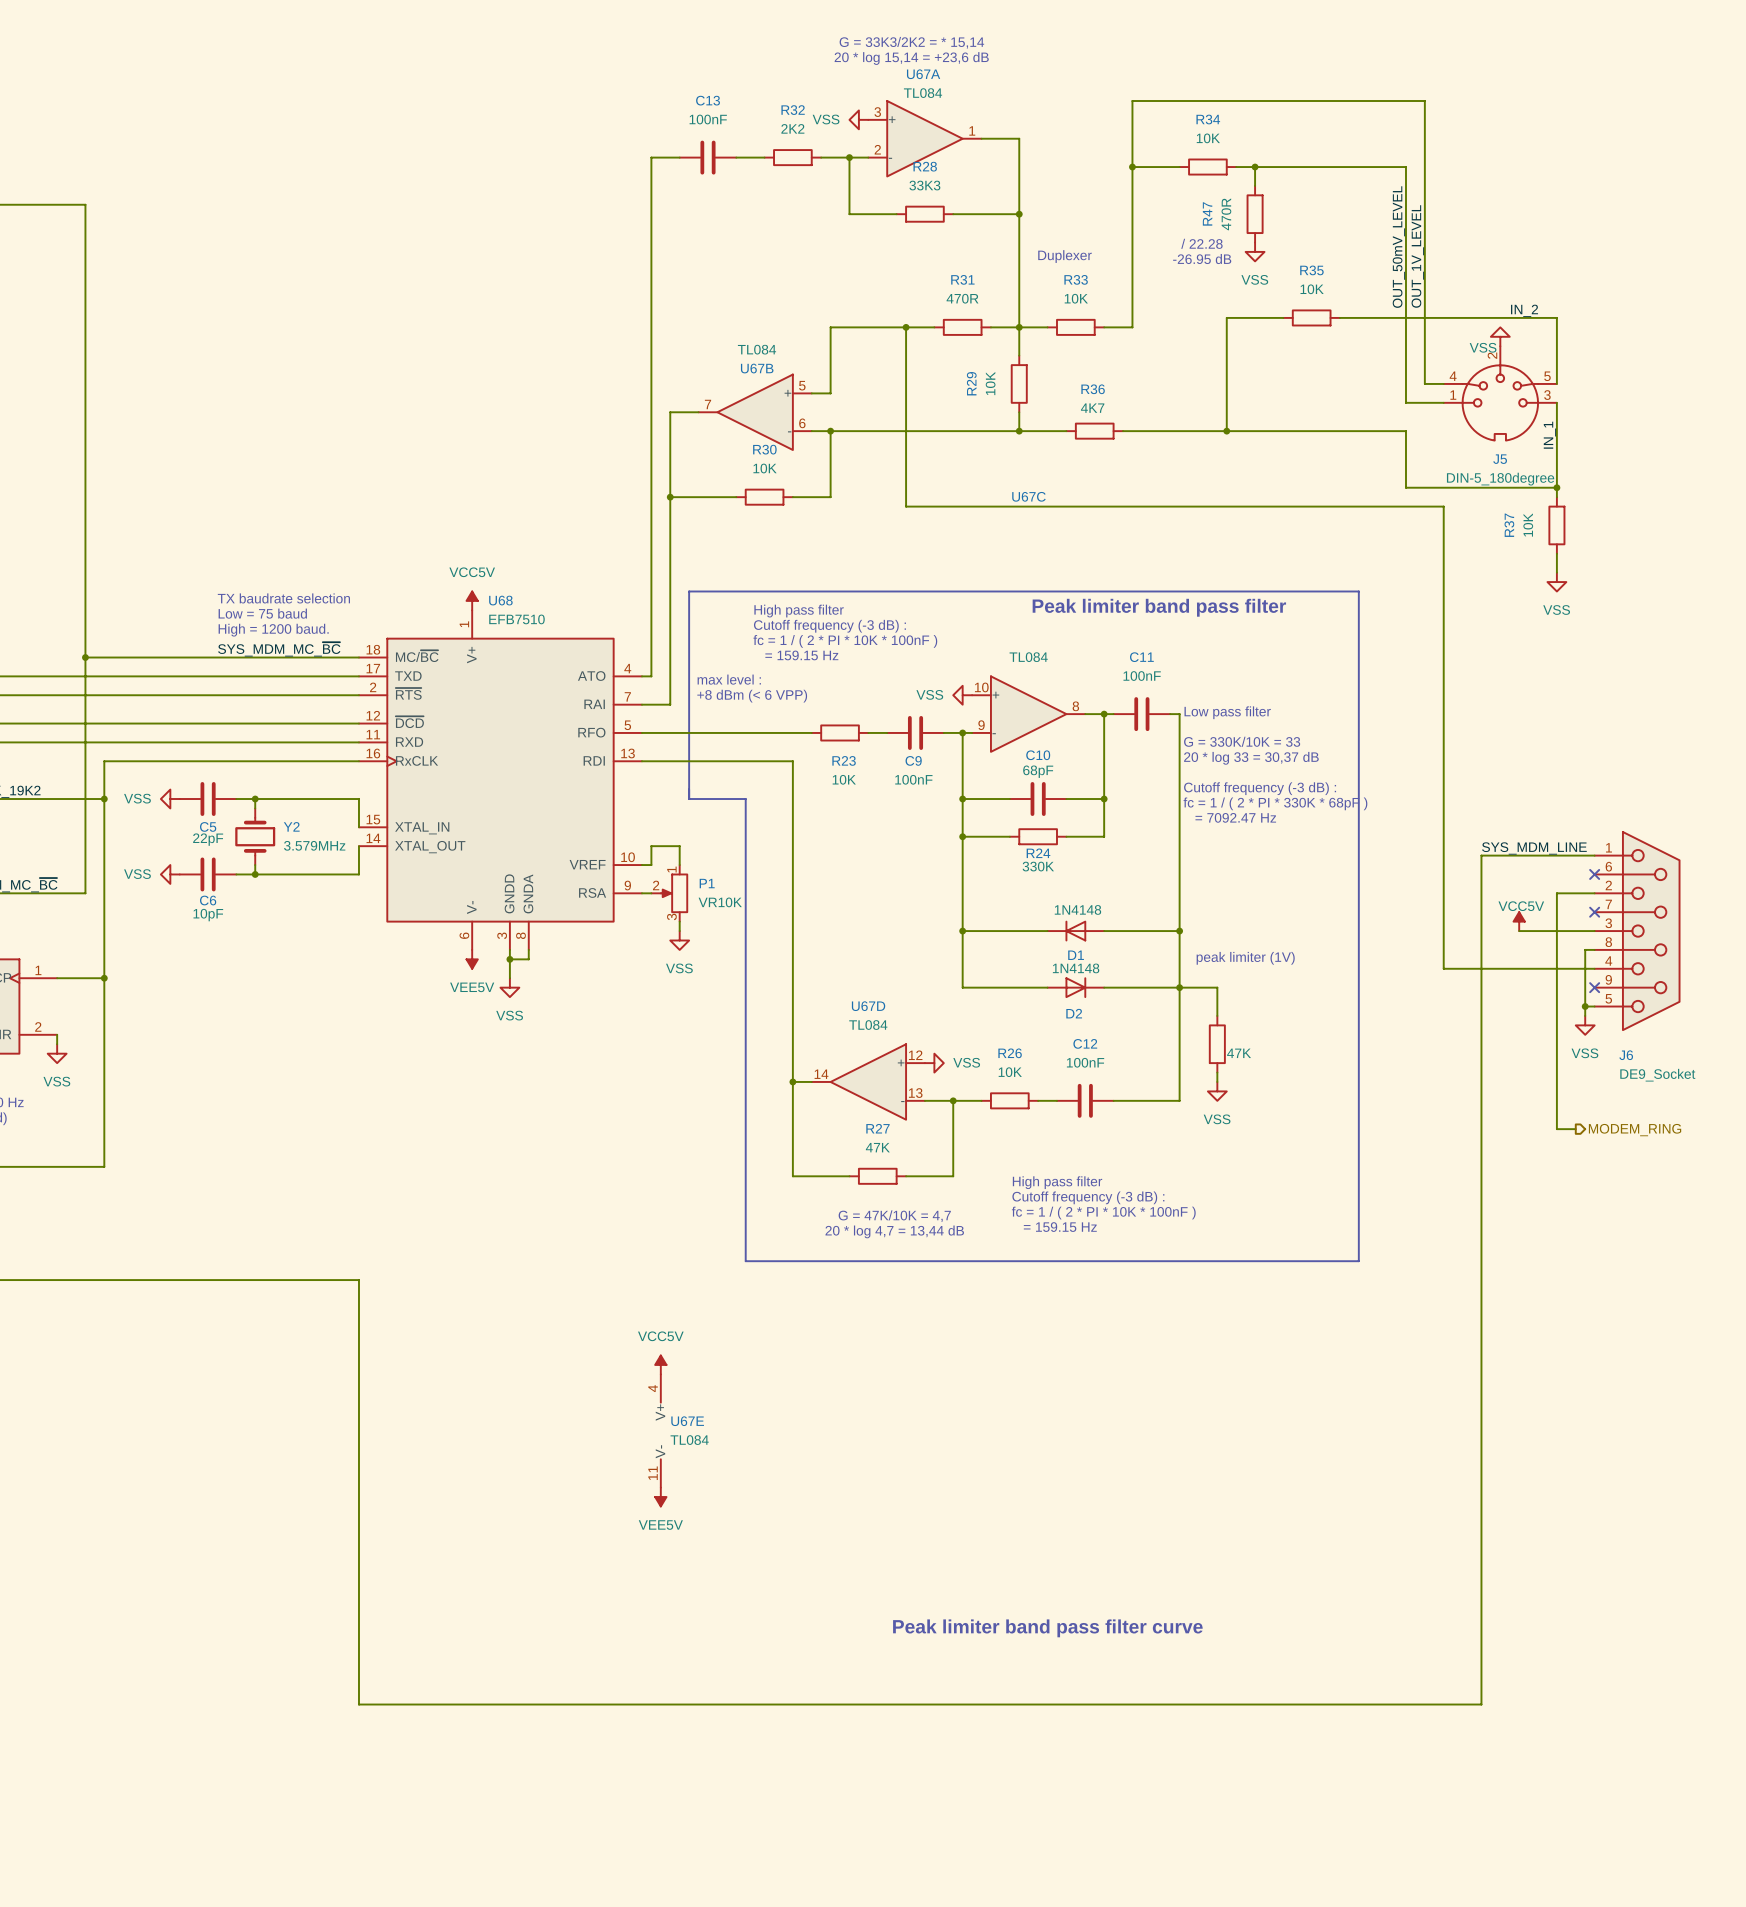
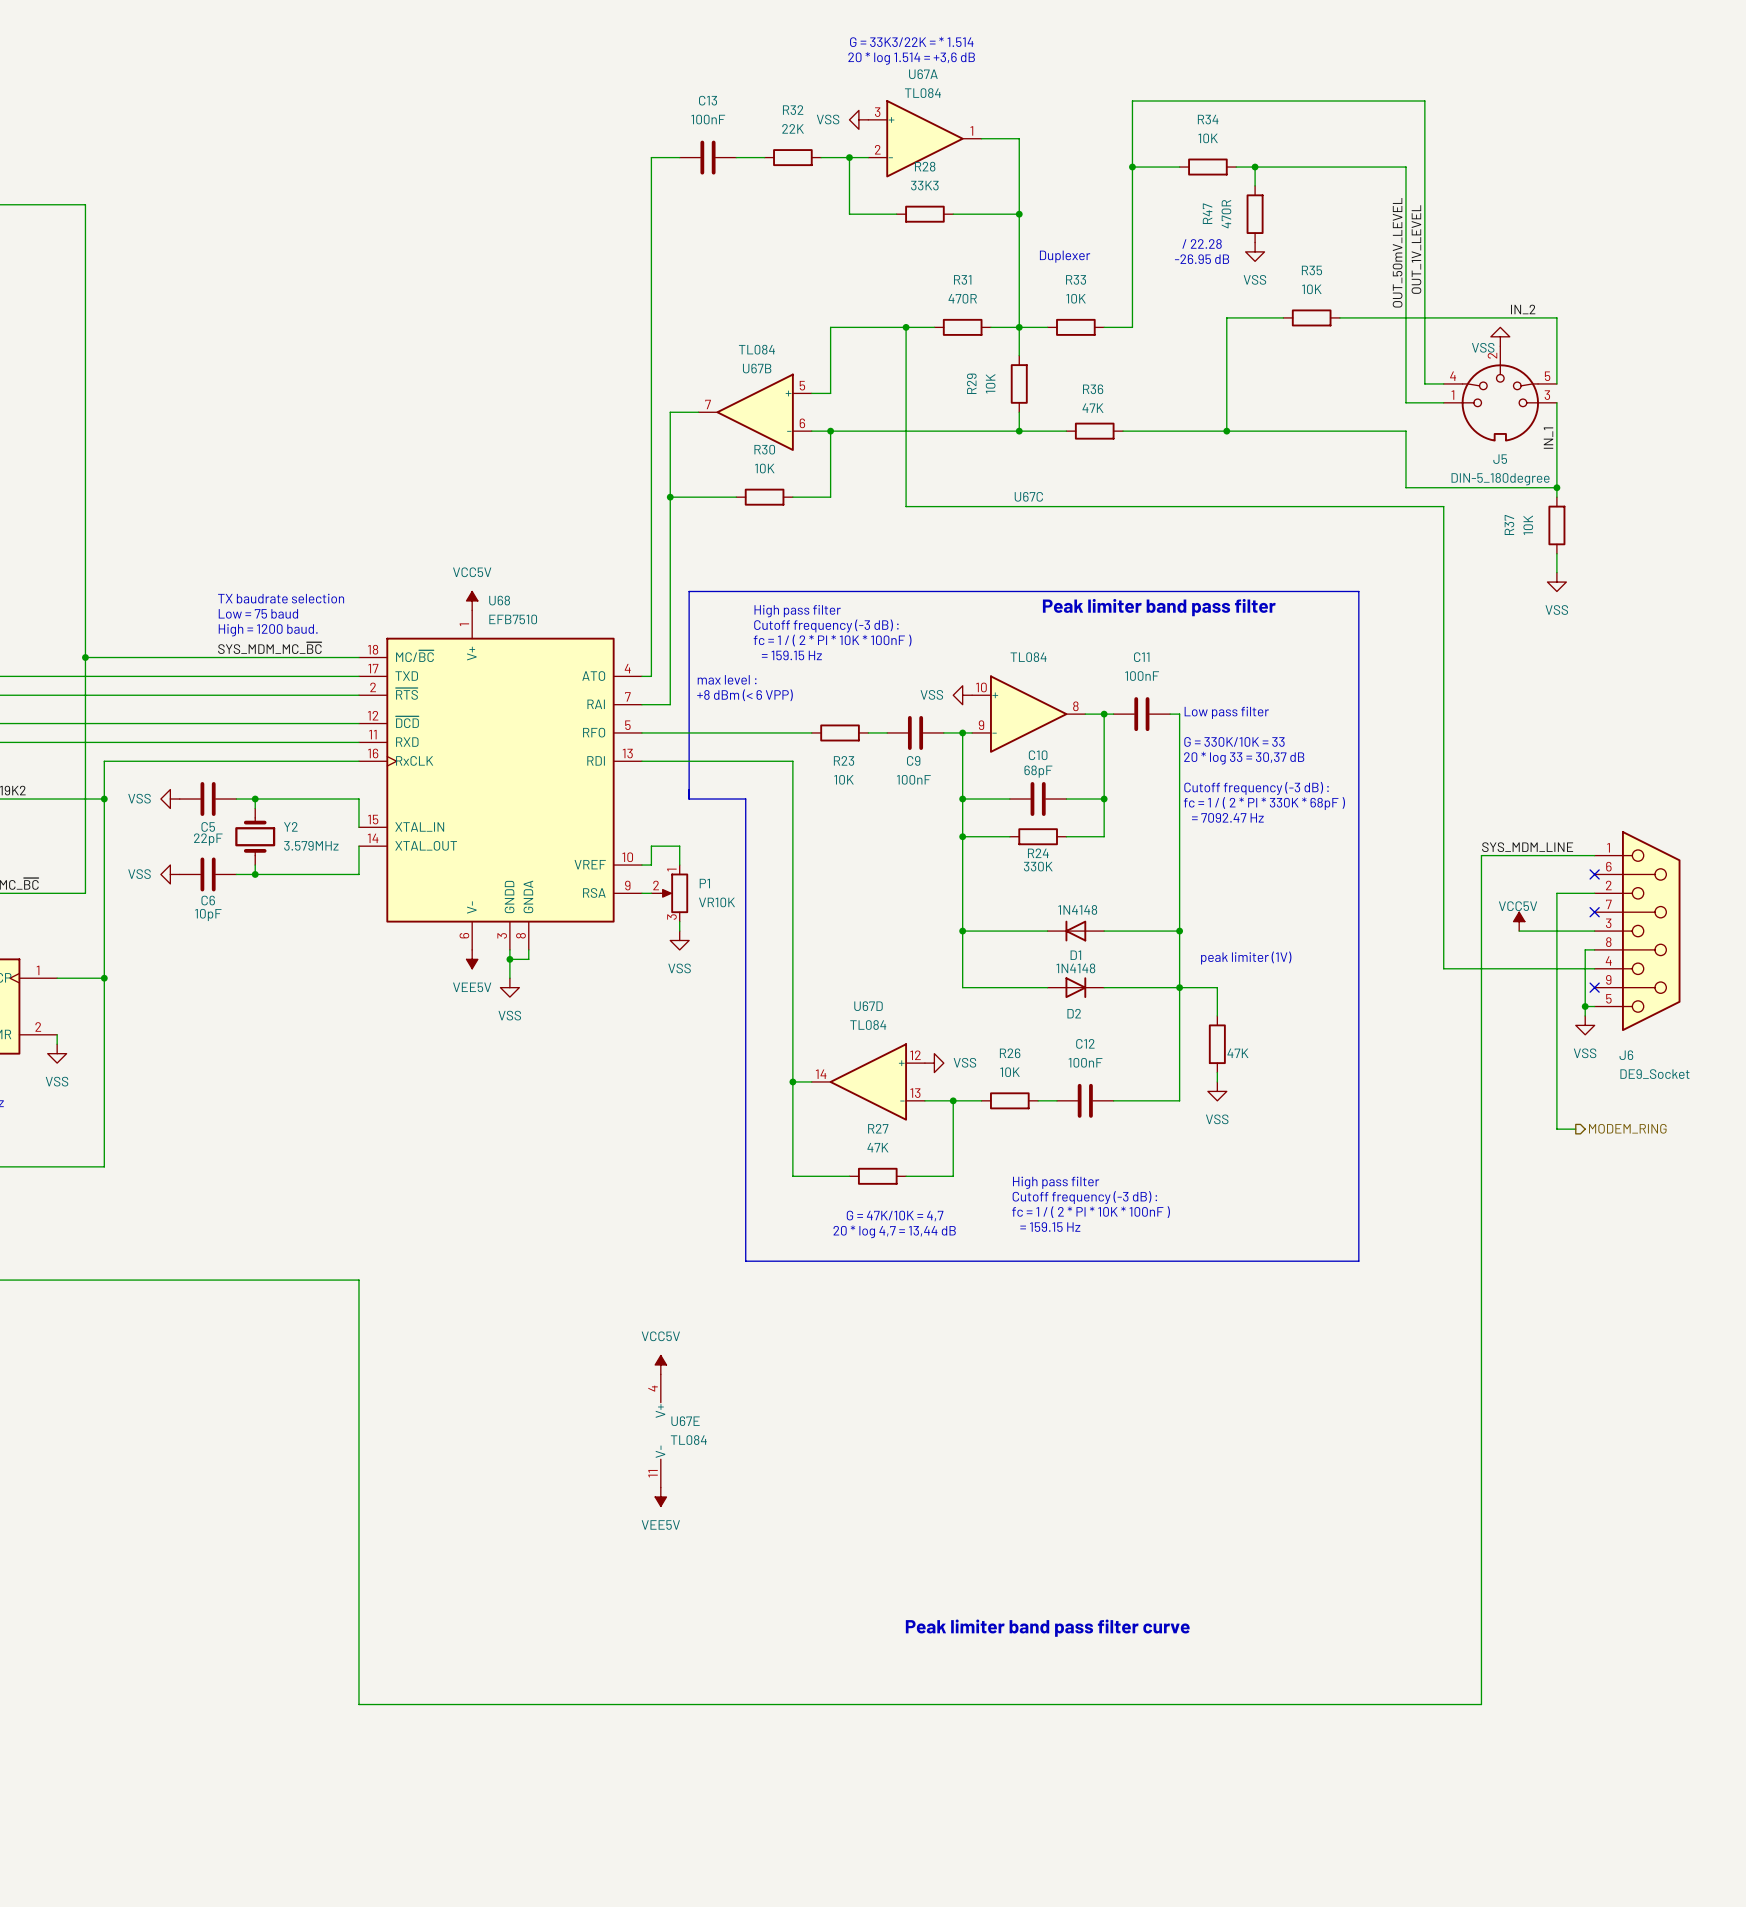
text: G = 33K3/2K2 = * 15,14 (911, 42) -> G = 33K3/22K = * 1.514 (911, 41)
text: 20 * log 15,14 = +23,6 dB (911, 58) -> 20 * log 1.514 = +3,6 dB (911, 58)
R32 value: 2K2 (792, 128) -> 22K (793, 128)
R36 value: 4K7 (1092, 408) -> 47K (1092, 408)

